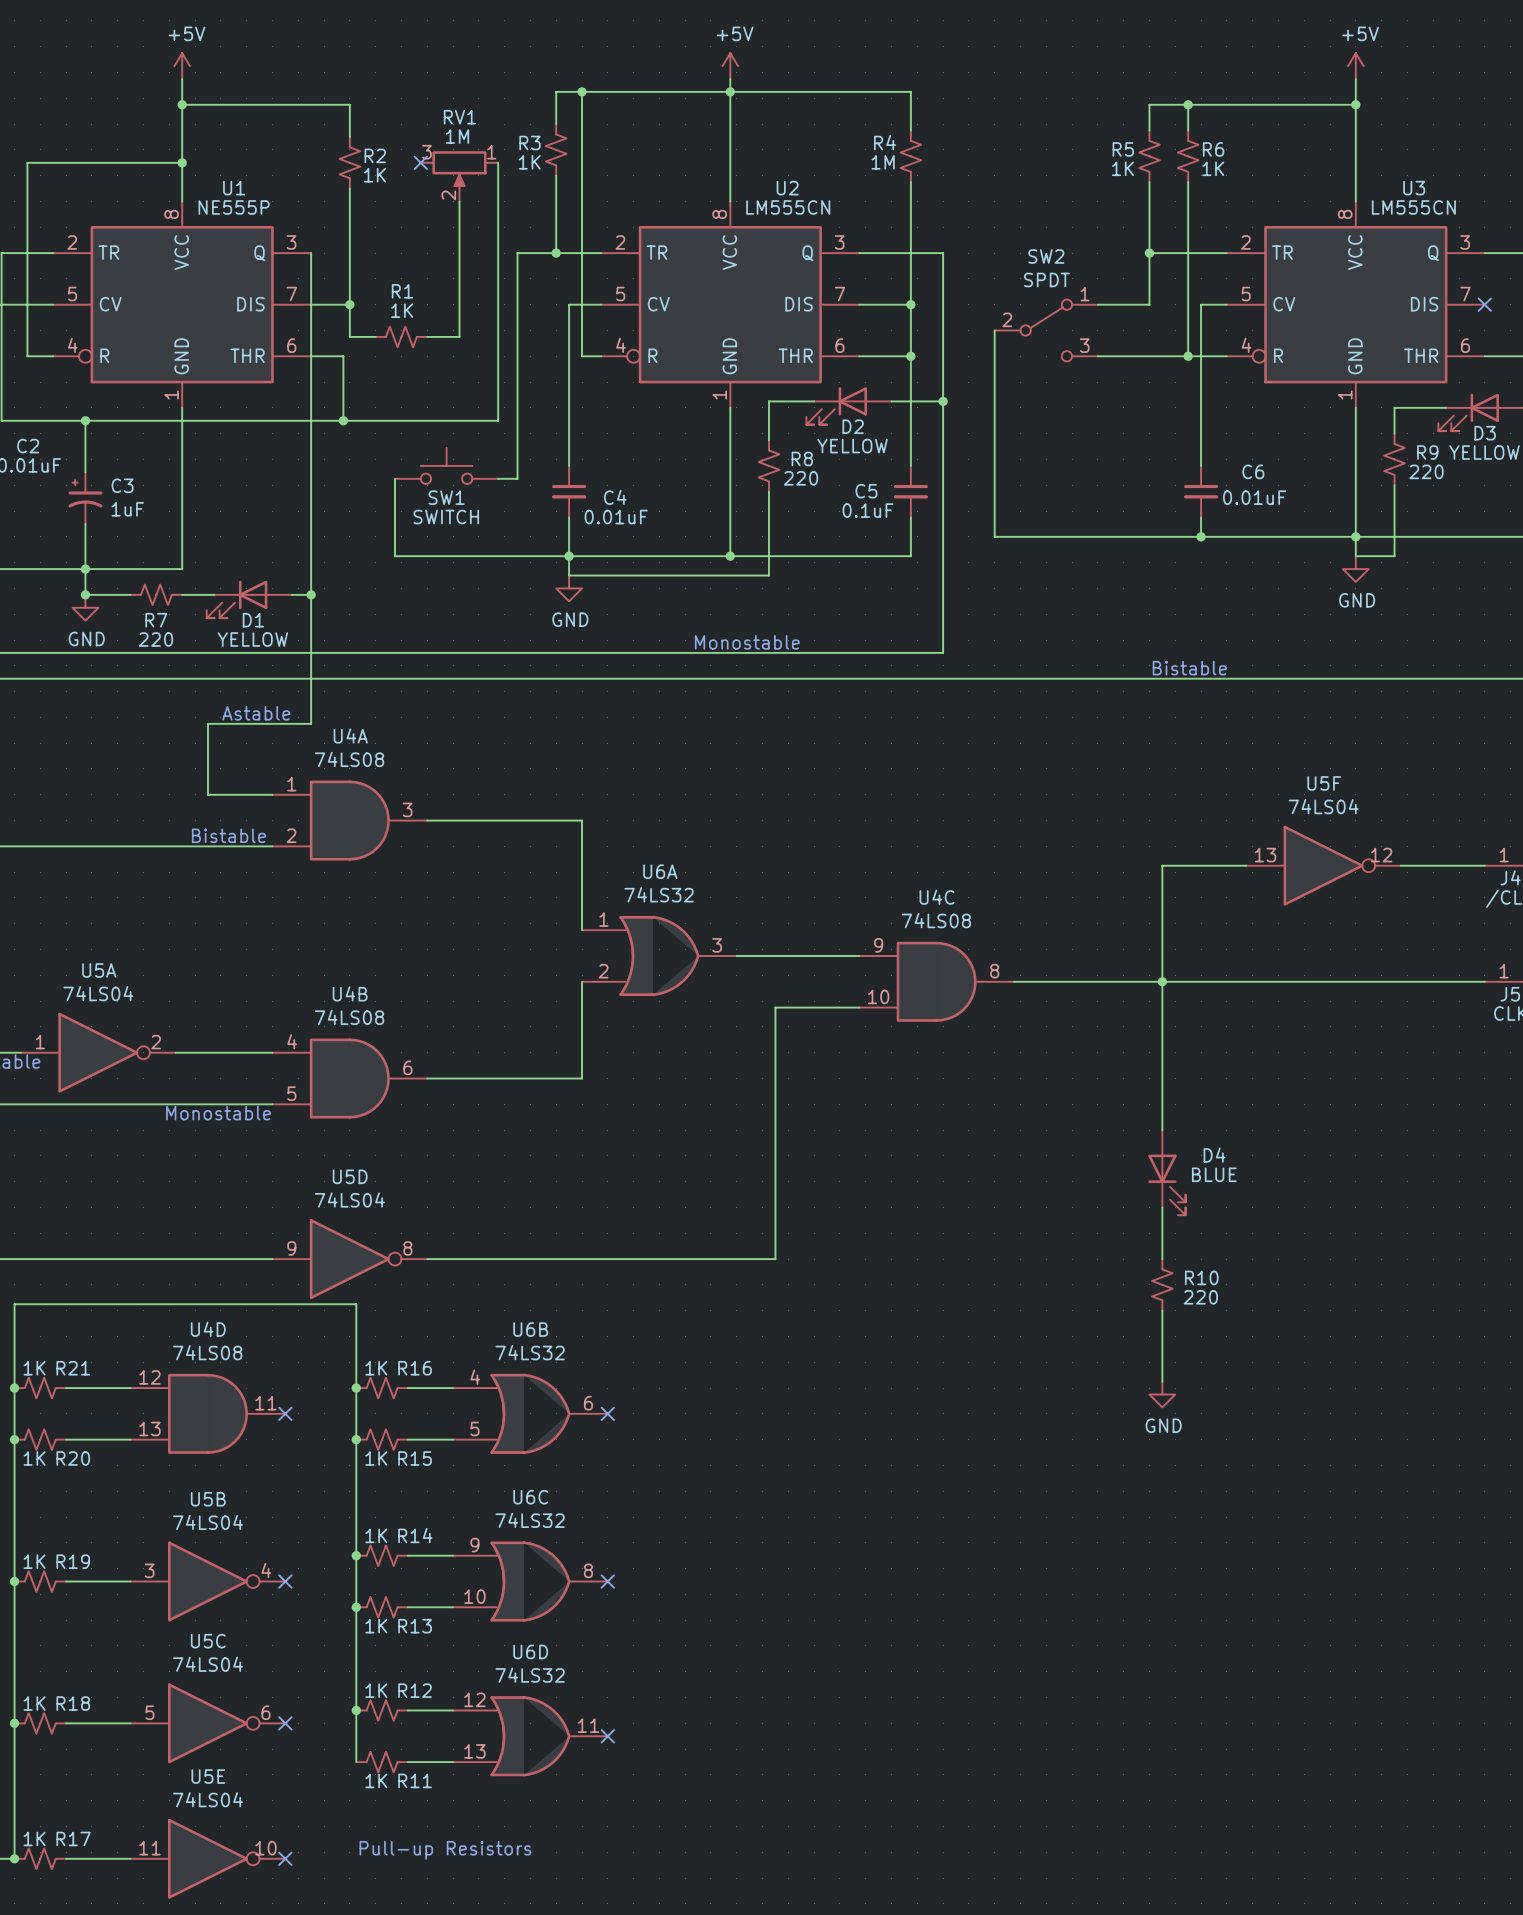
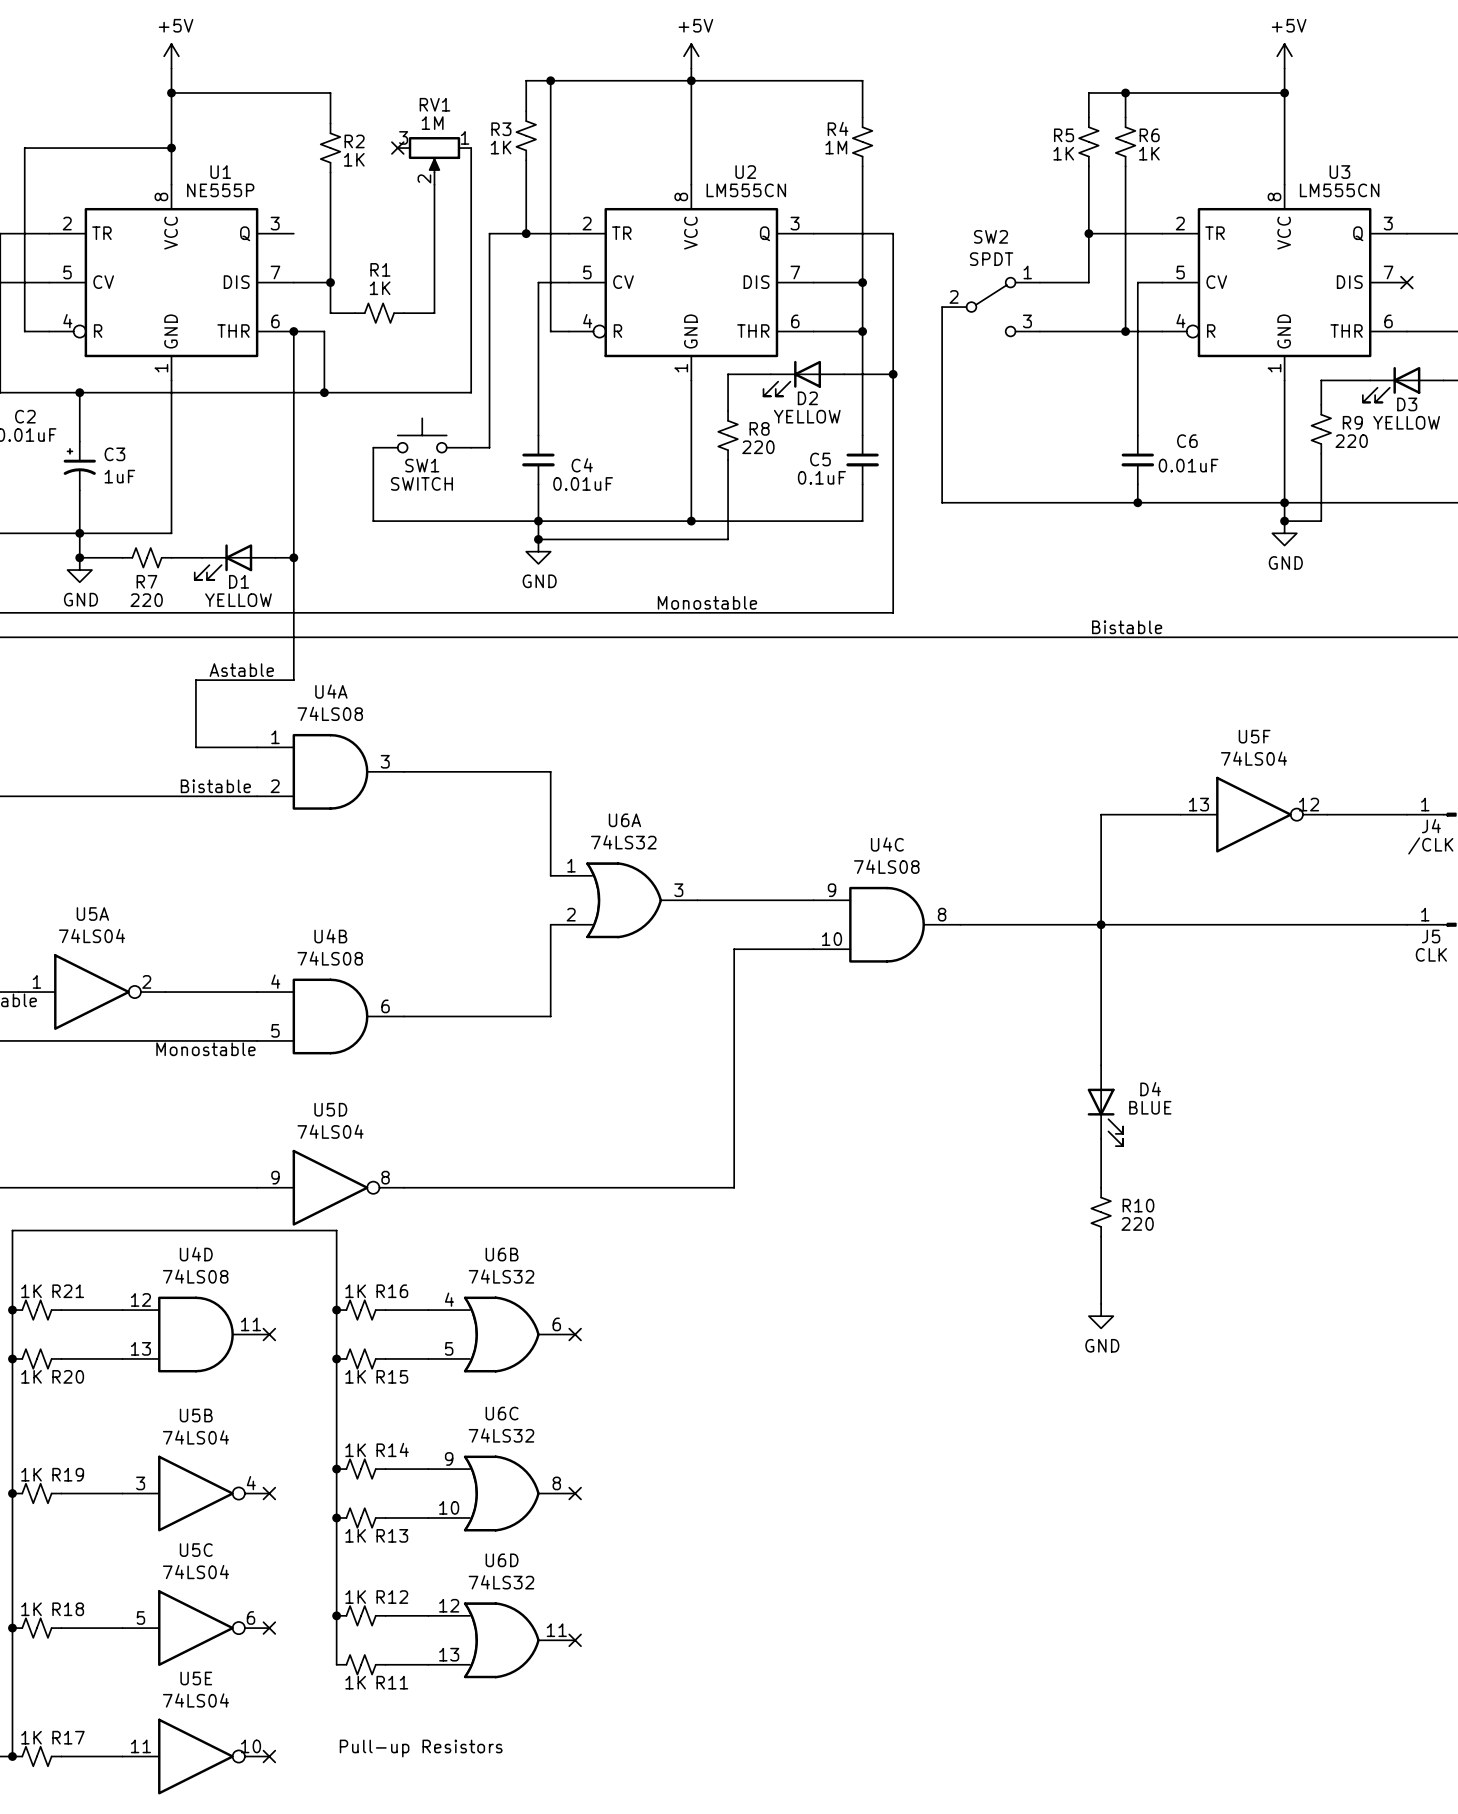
wire: (311, 253) (311, 356) -> none
junction: none -> (293, 331)
junction: none -> (1284, 521)
junction: none -> (538, 539)

